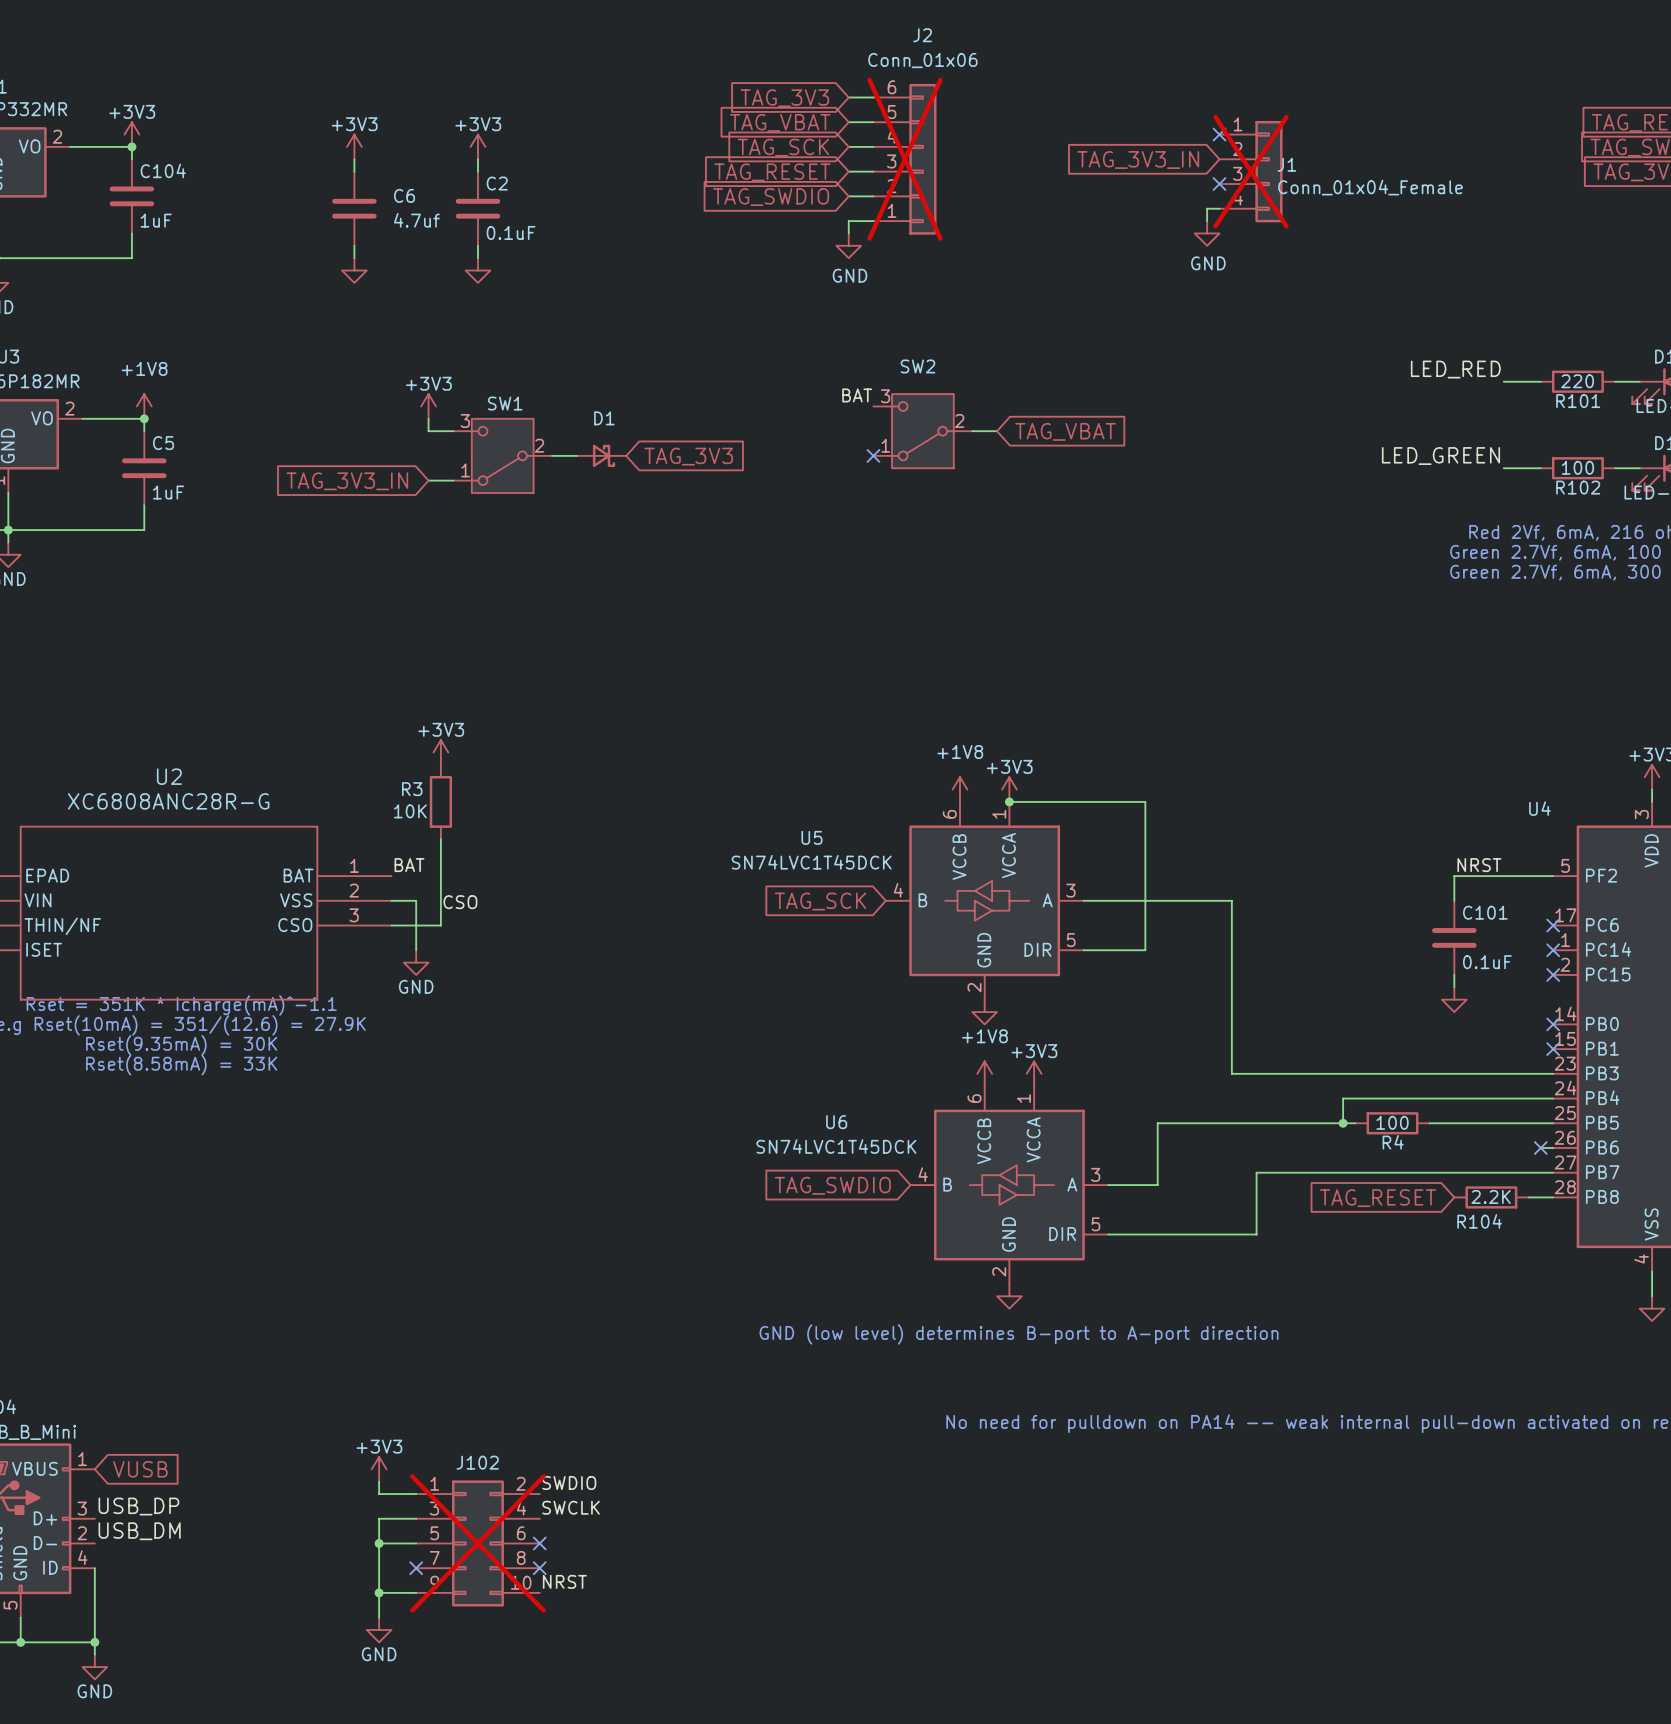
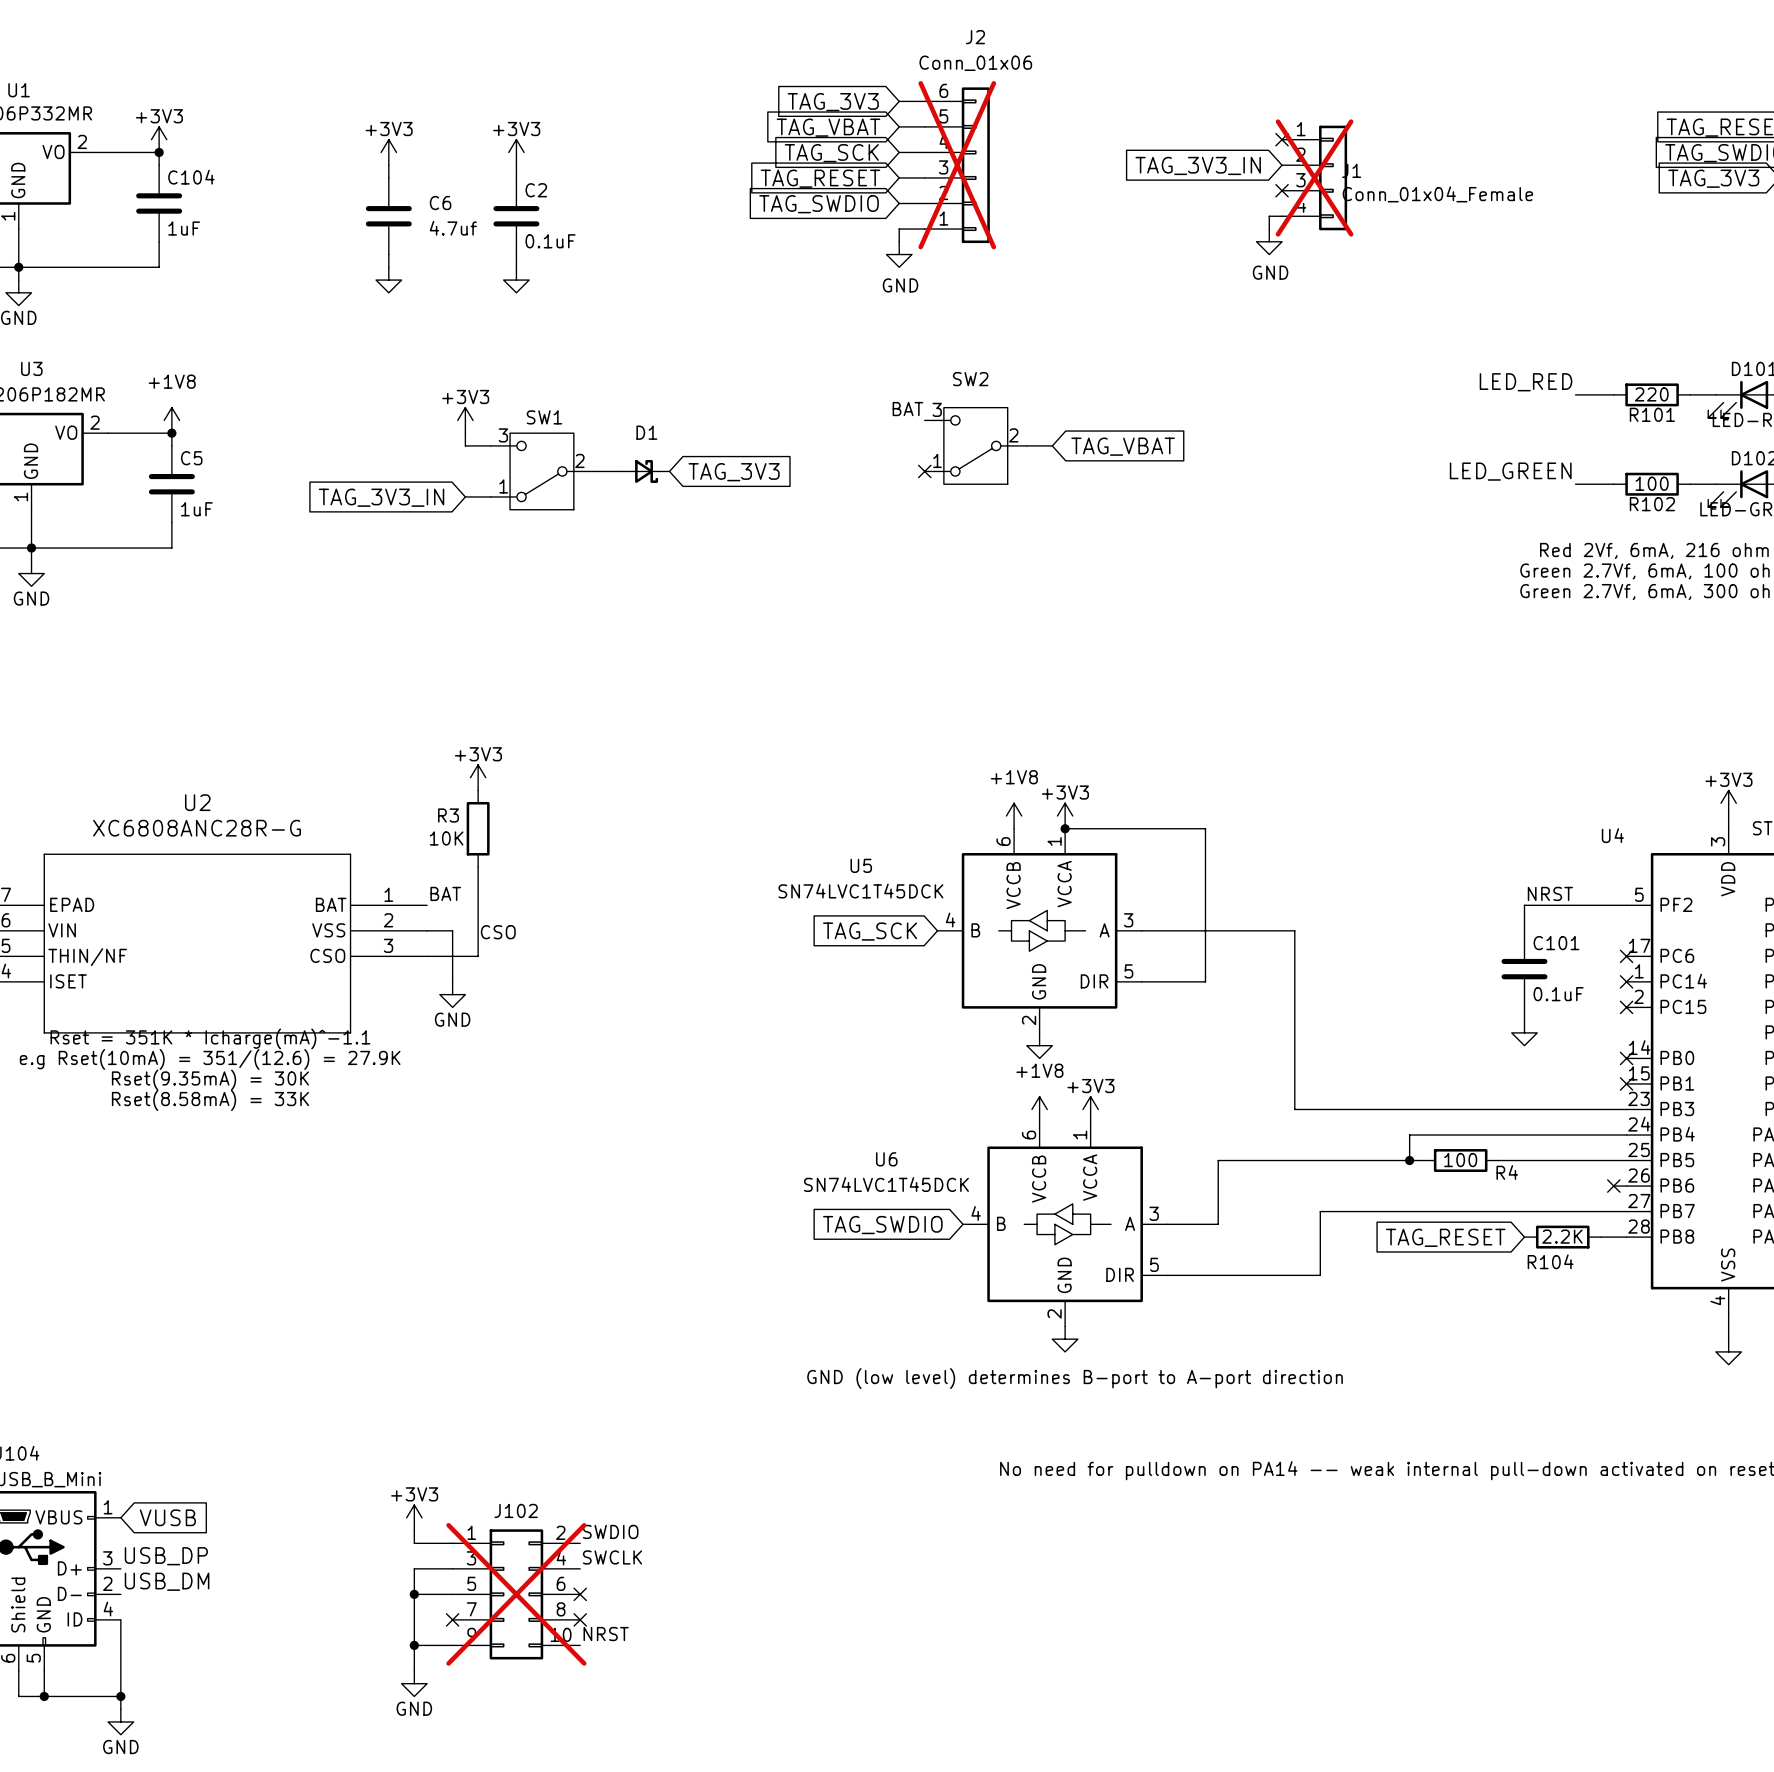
R4 name position: R4 (1393, 1142) -> R4 (1507, 1172)

